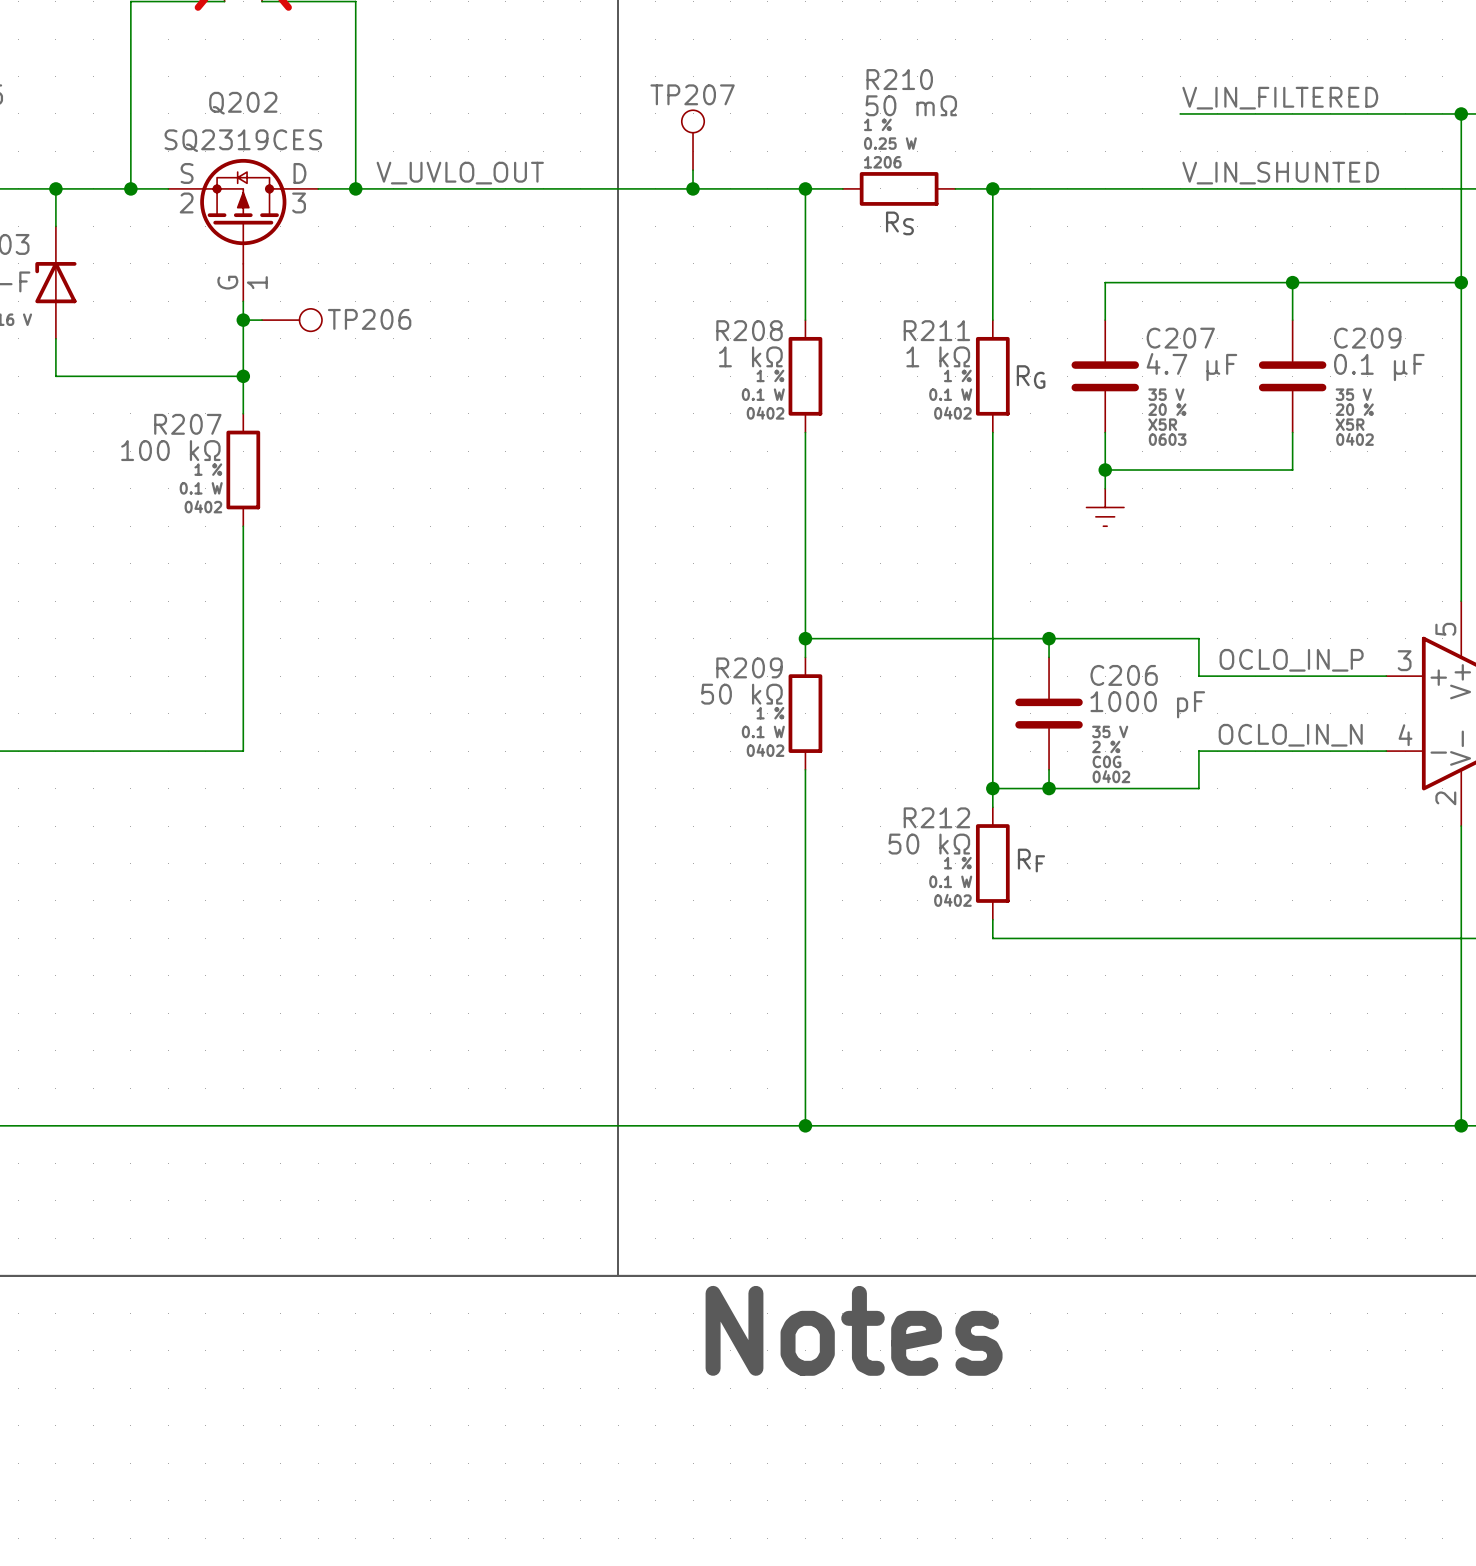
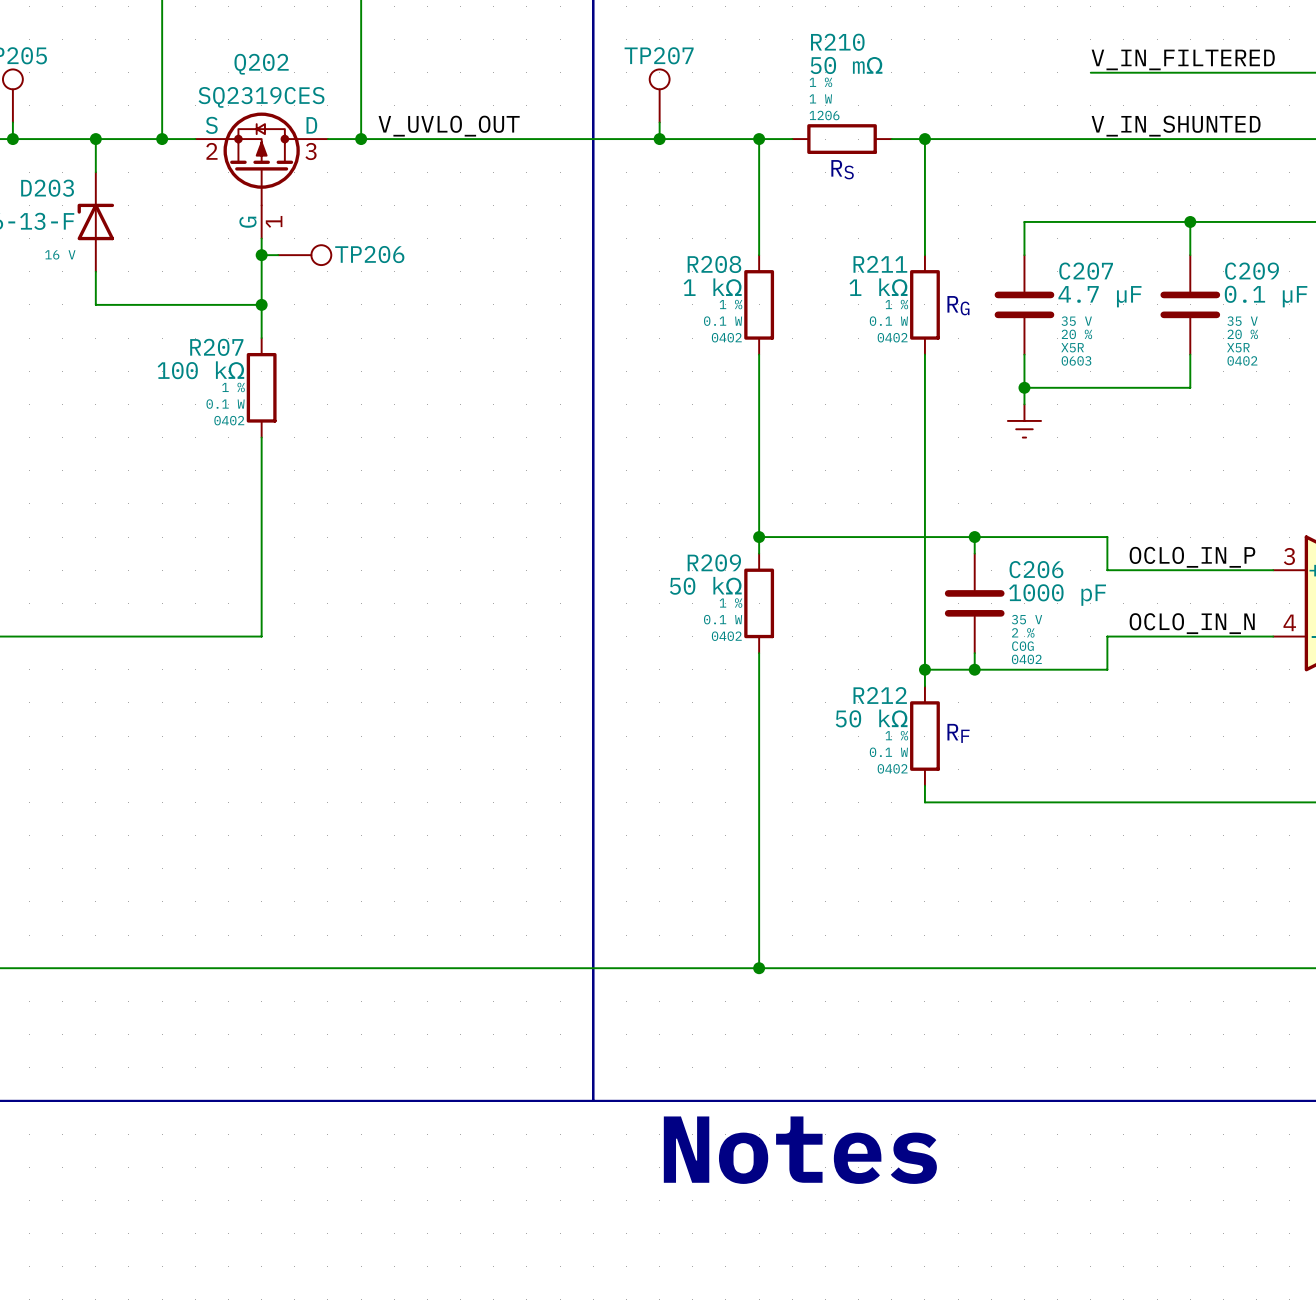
R210 text: 0.25 W (890, 143) -> 1 W (820, 98)

